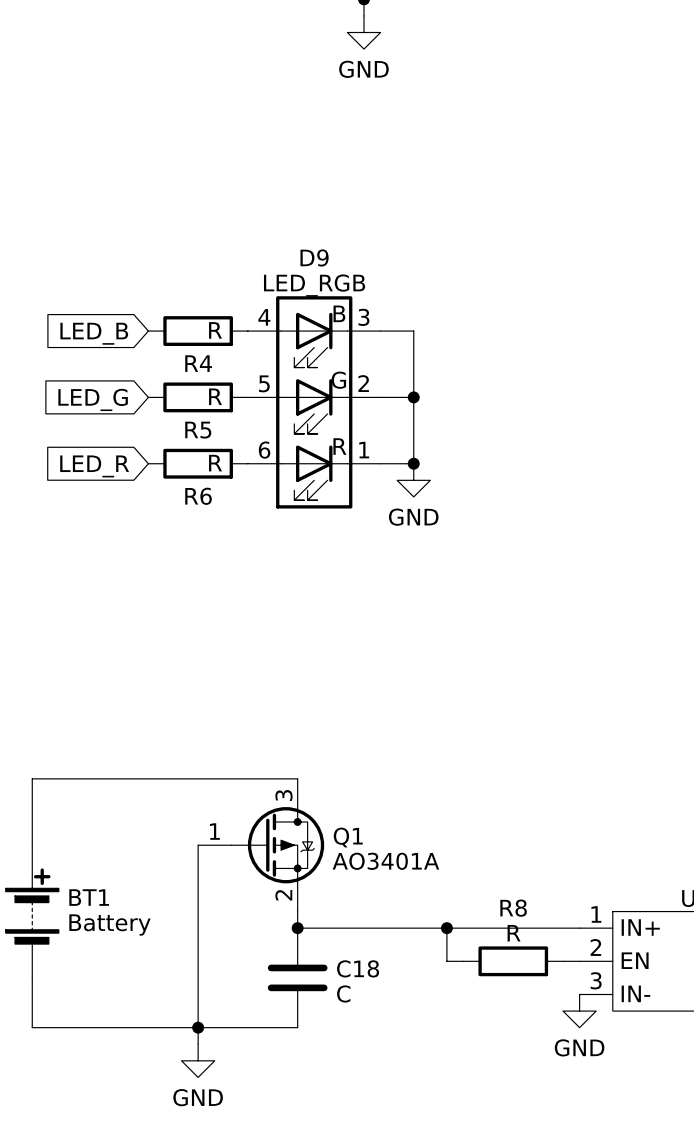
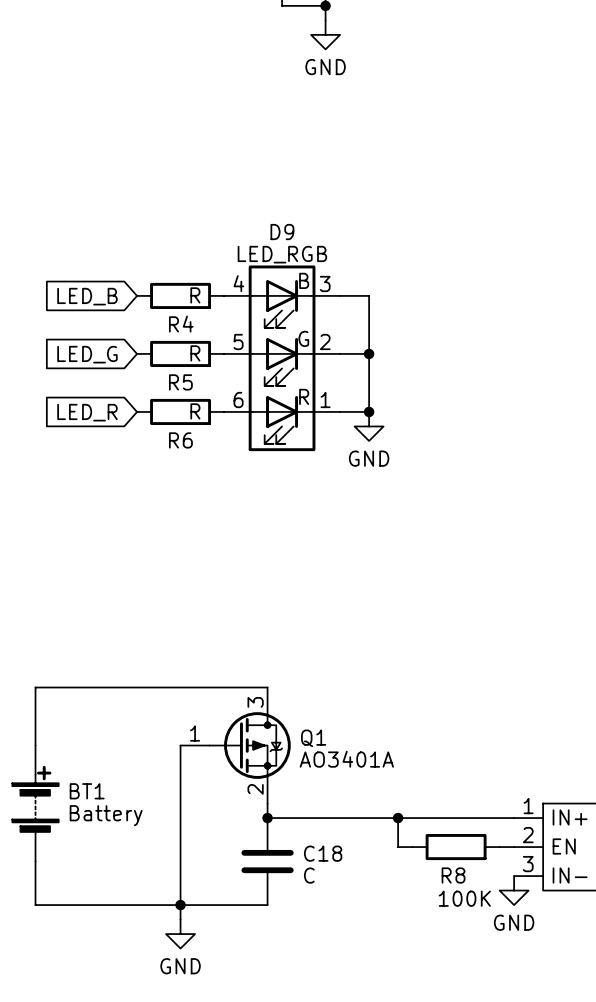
R8 name position: R8 (513, 908) -> R8 (453, 875)
R8 value: R (514, 933) -> 100K (464, 898)

